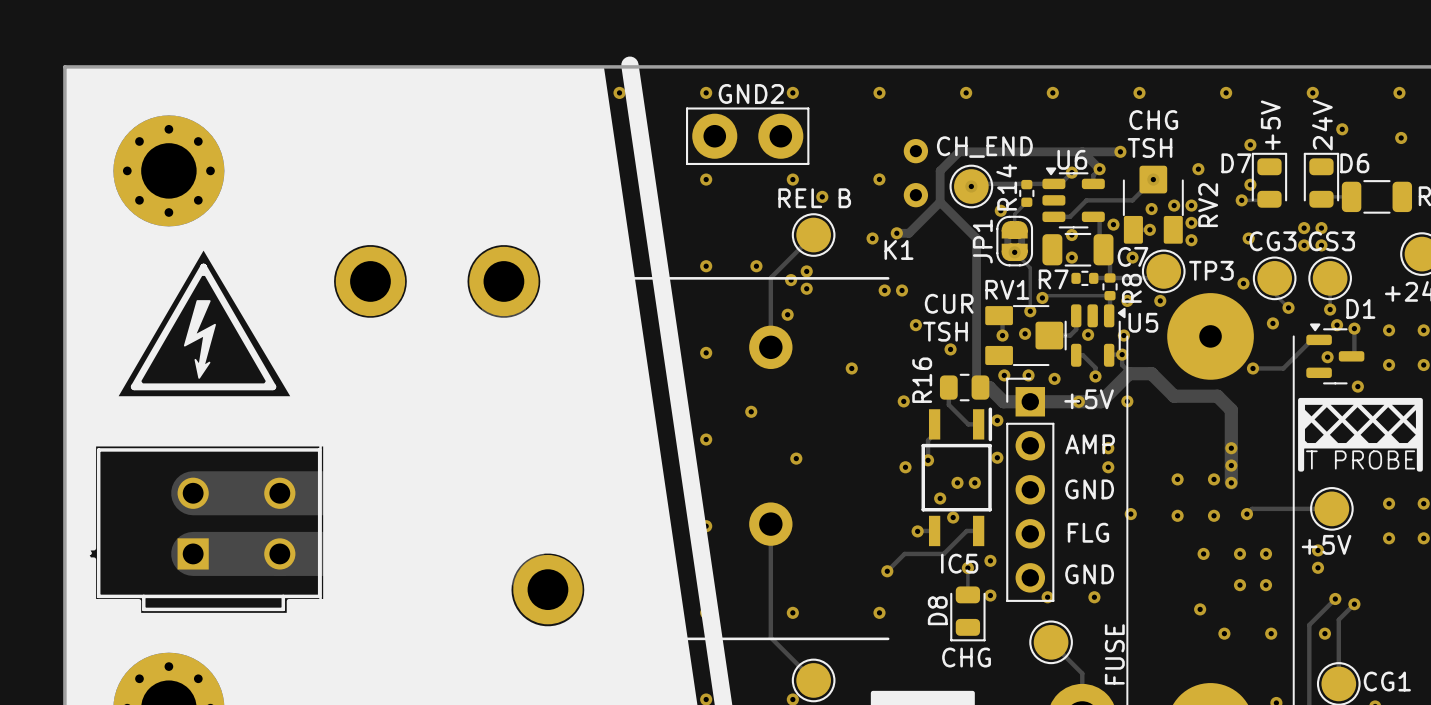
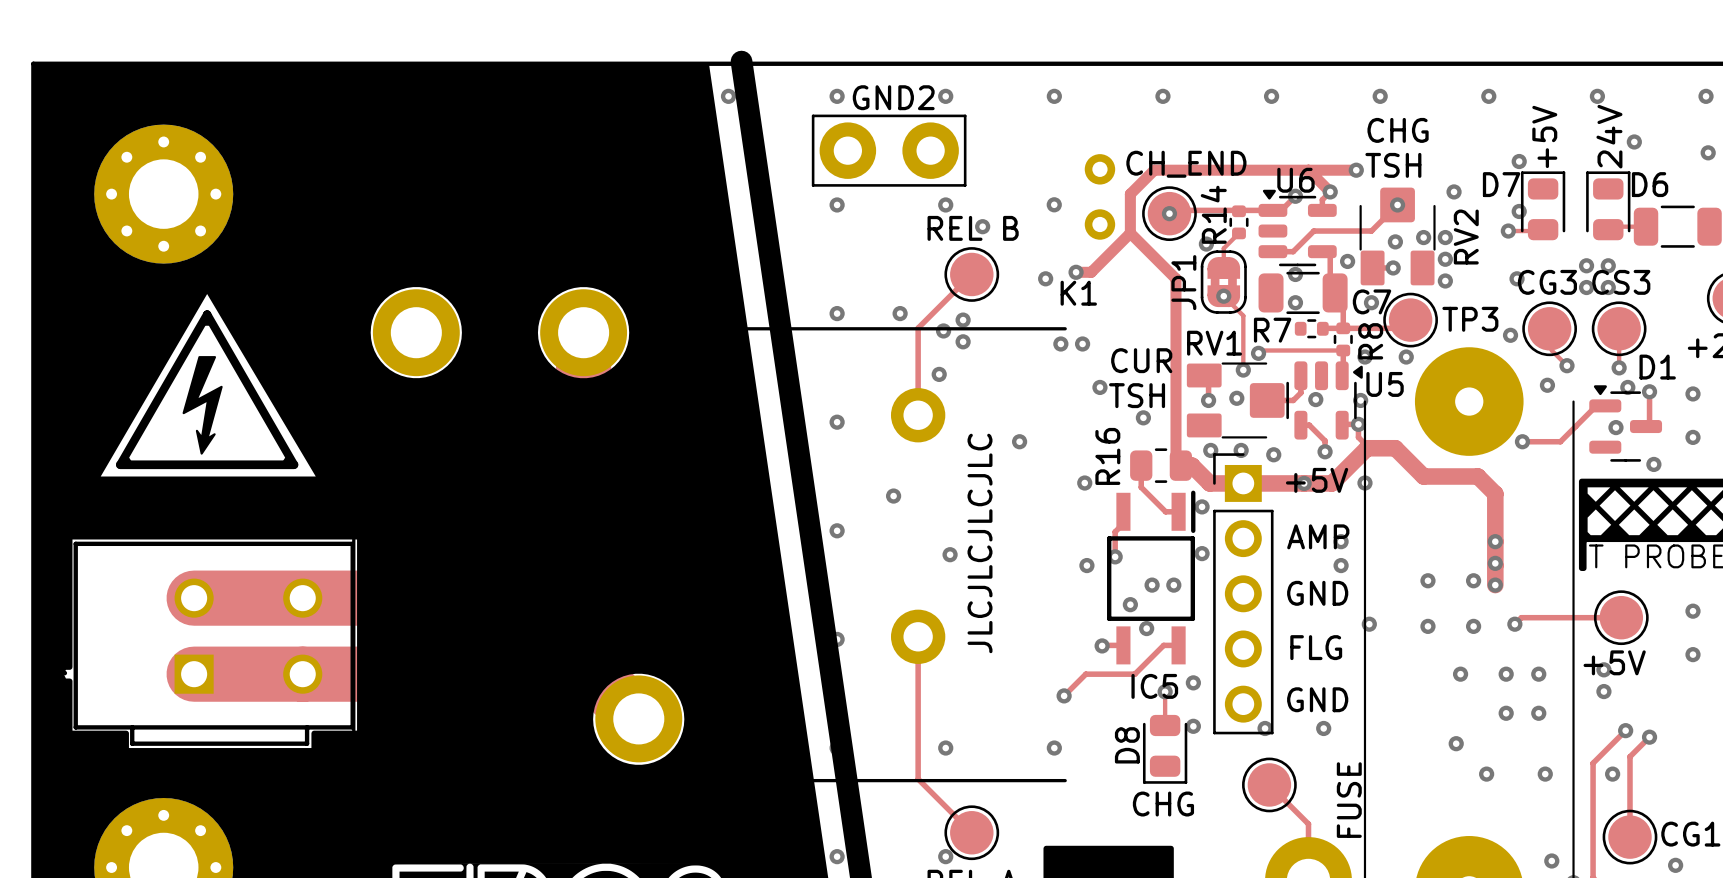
text: none -> JLCJLCJLCJLC (980, 543)

